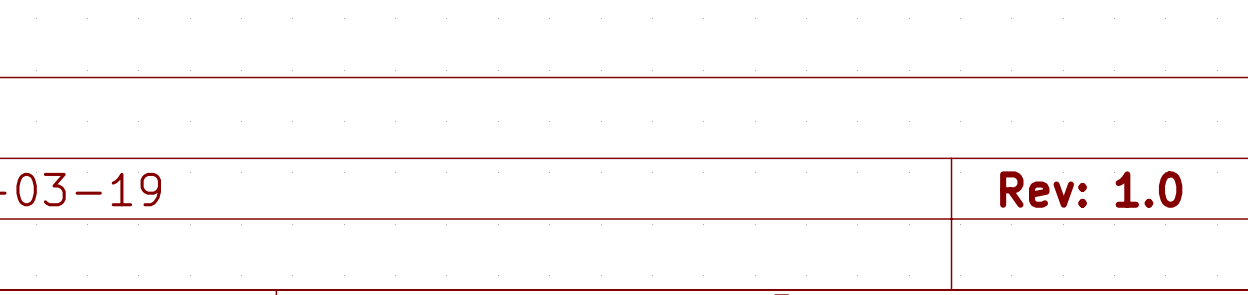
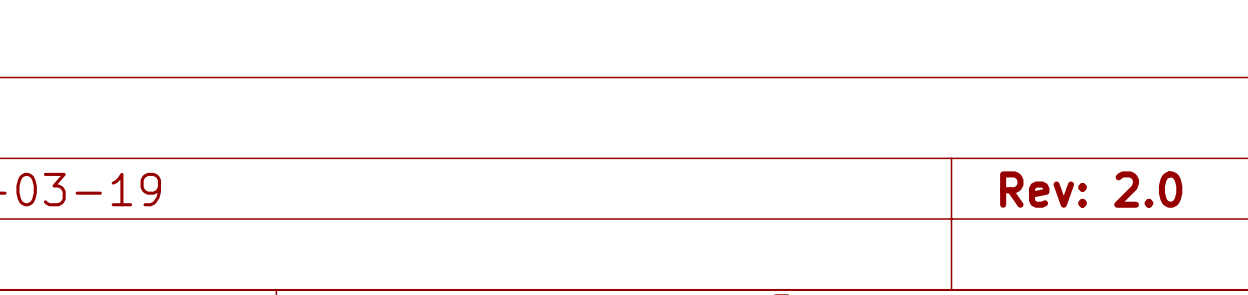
title block: Rev: 1.0 (1091, 189) -> Rev: 2.0 (1091, 189)

